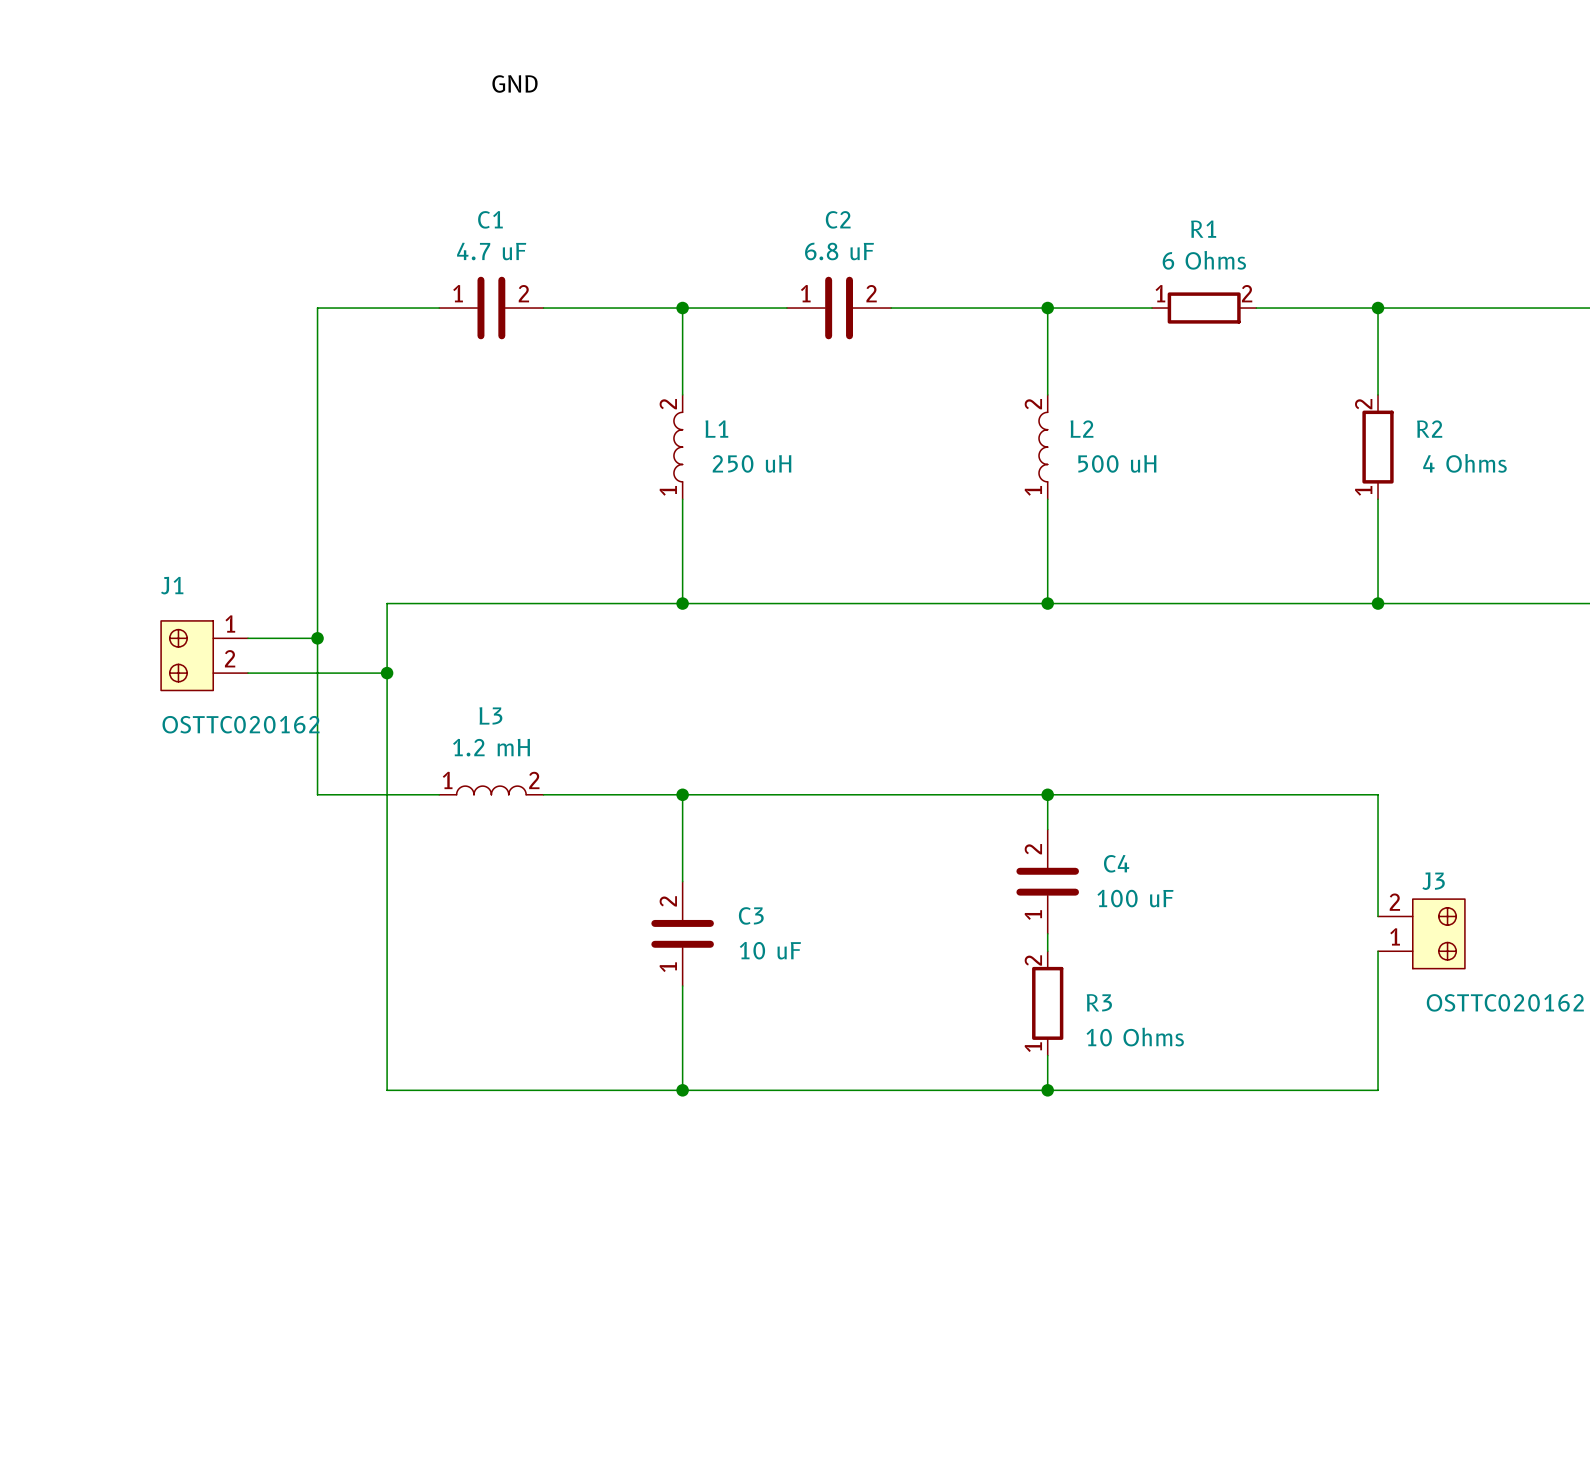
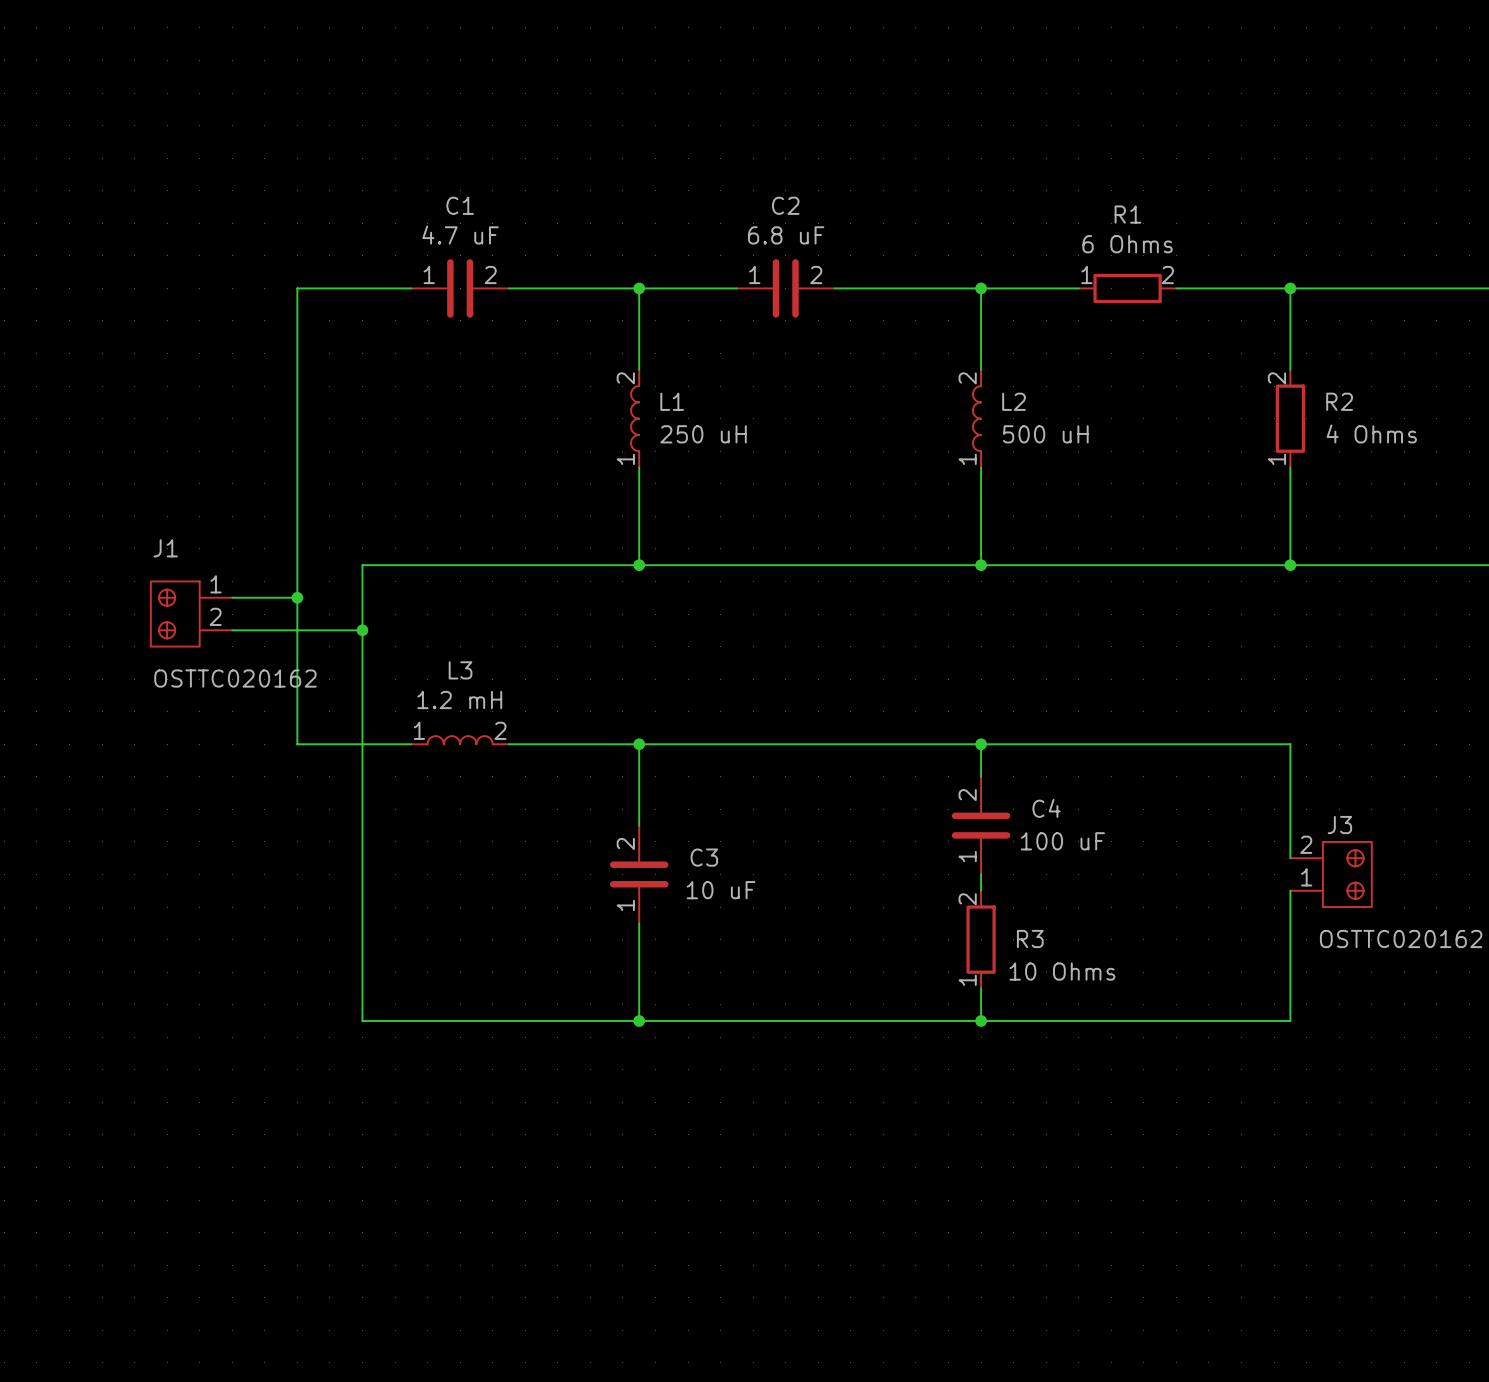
label: GND (514, 83) -> none

